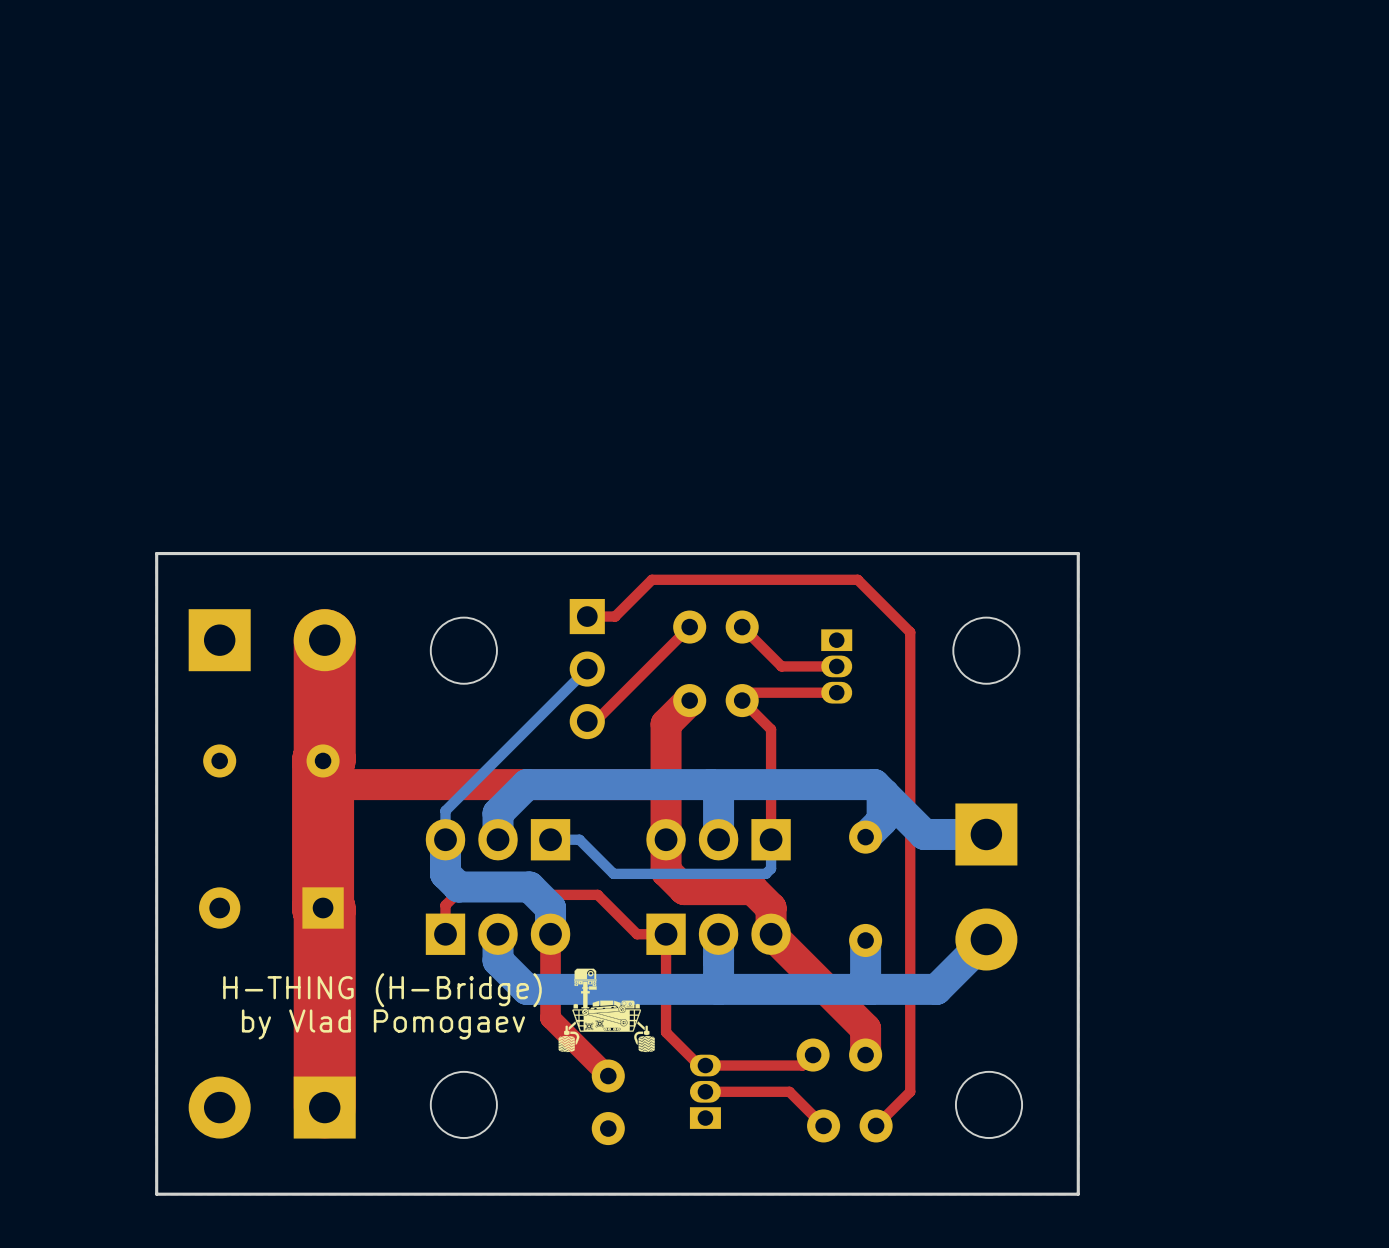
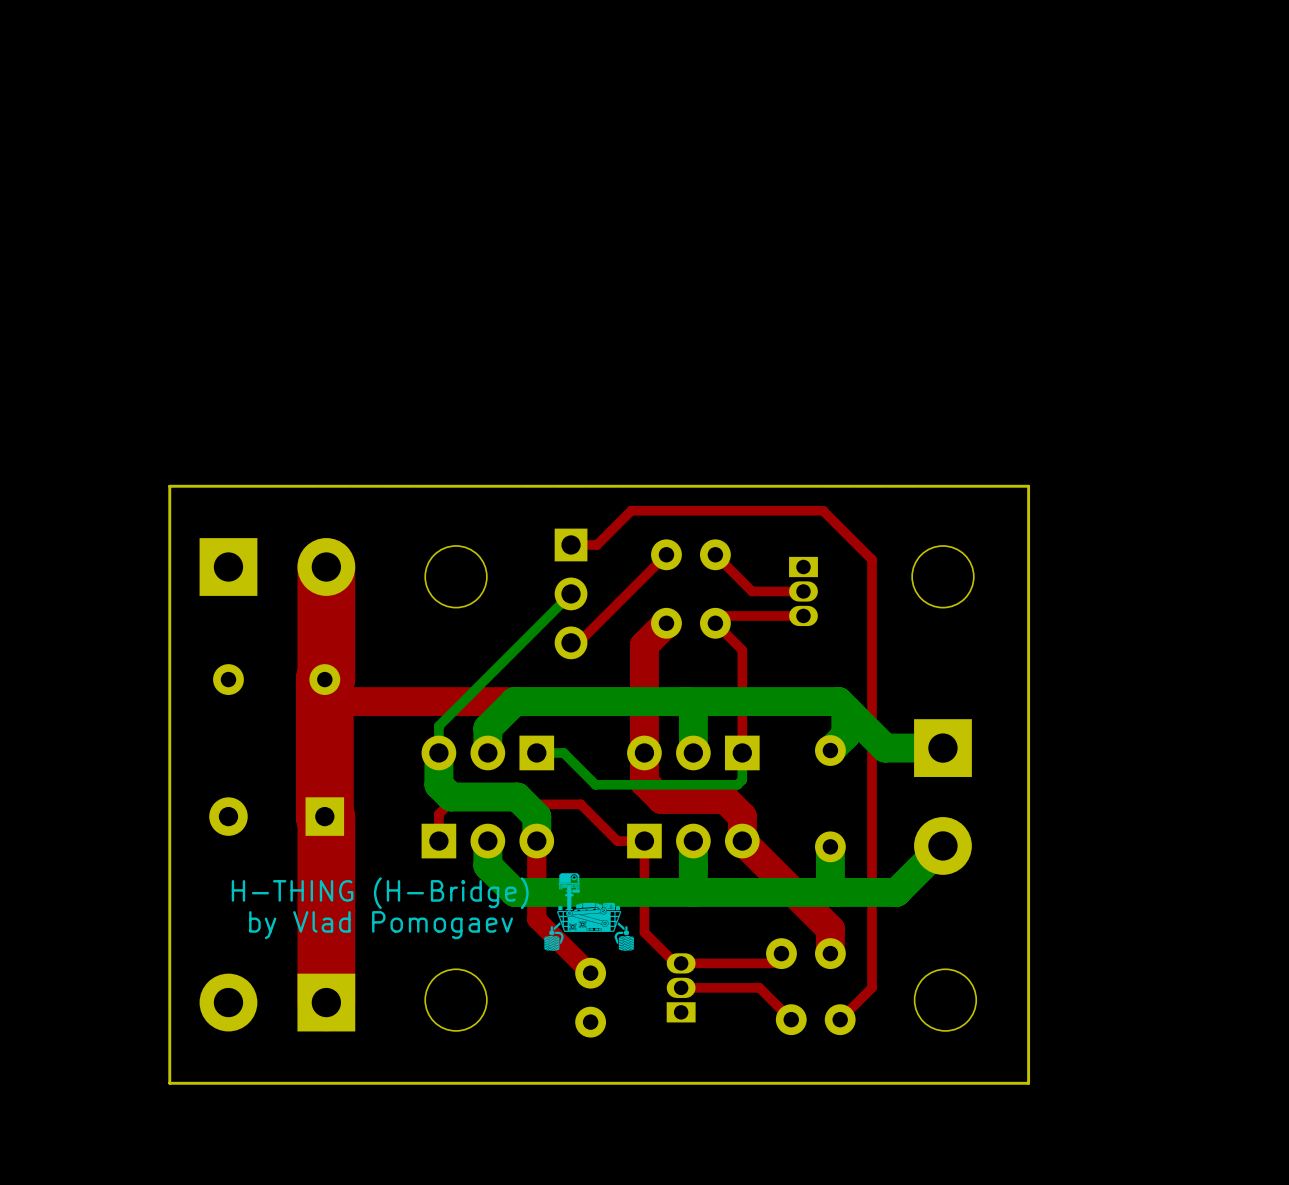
part footprint: [425, 819, 571, 861] -> [421, 735, 555, 771]
part footprint: [646, 819, 791, 861] -> [627, 735, 760, 771]
part footprint: [425, 913, 571, 955] -> [421, 823, 555, 859]
part footprint: [646, 913, 791, 955] -> [627, 823, 760, 859]

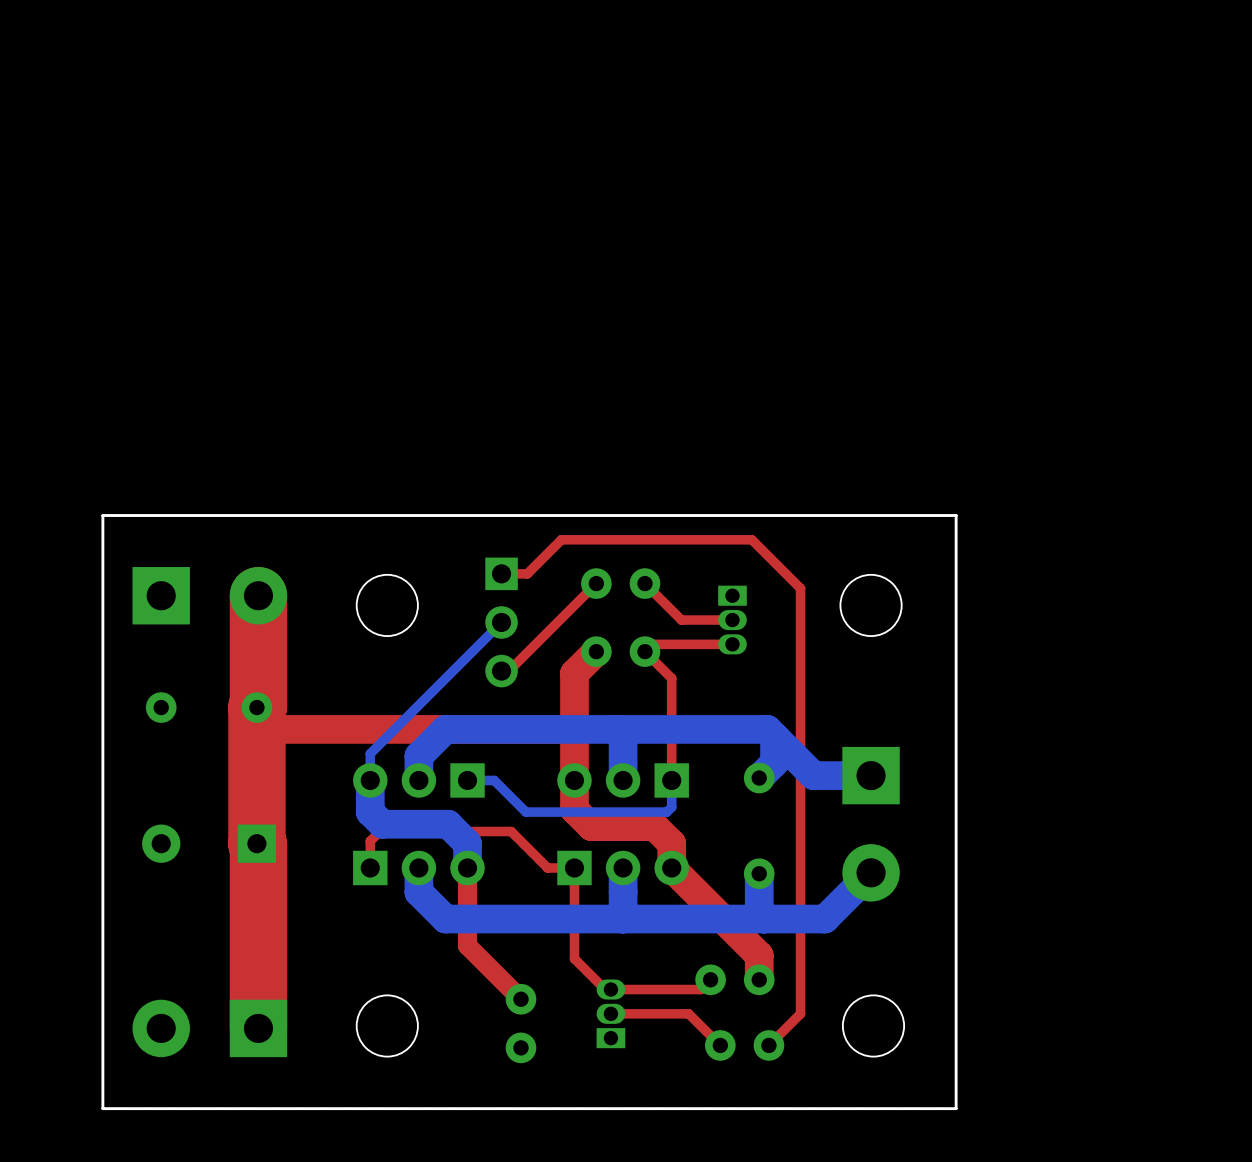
drawing: [544, 873, 634, 951] -> none
text: H-THING (H-Bridge) (380, 893) -> none
text: by Vlad Pomogaev (381, 925) -> none

